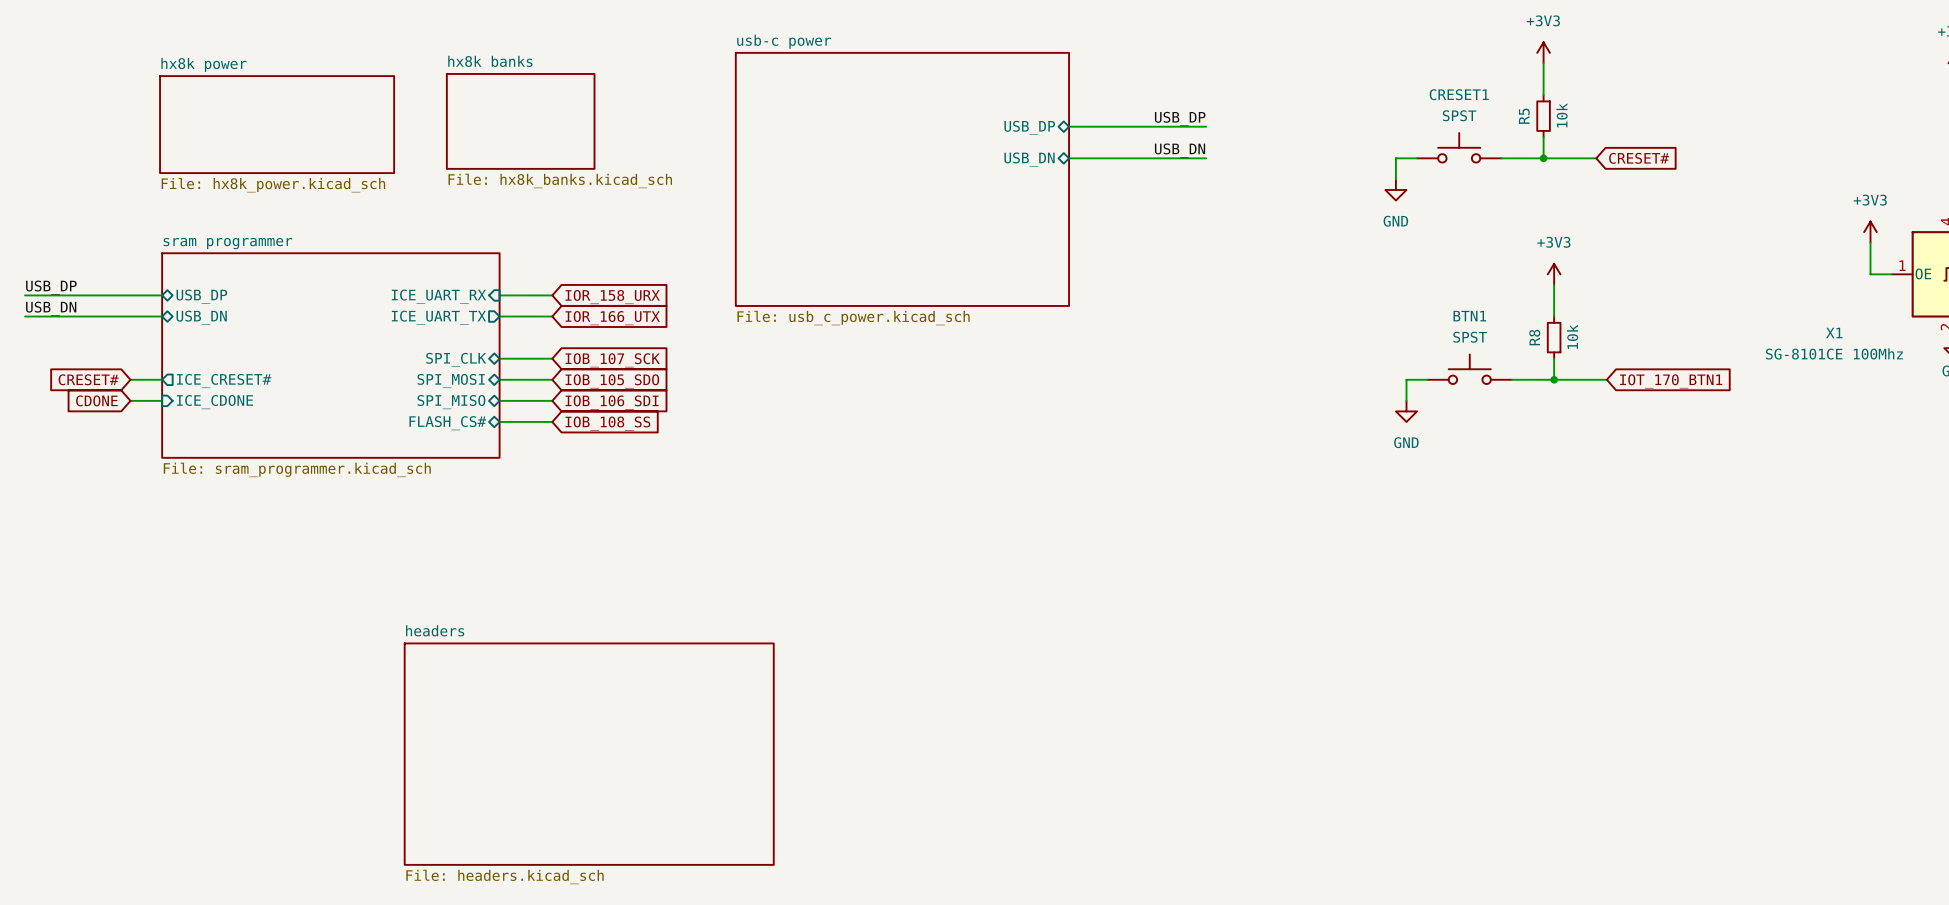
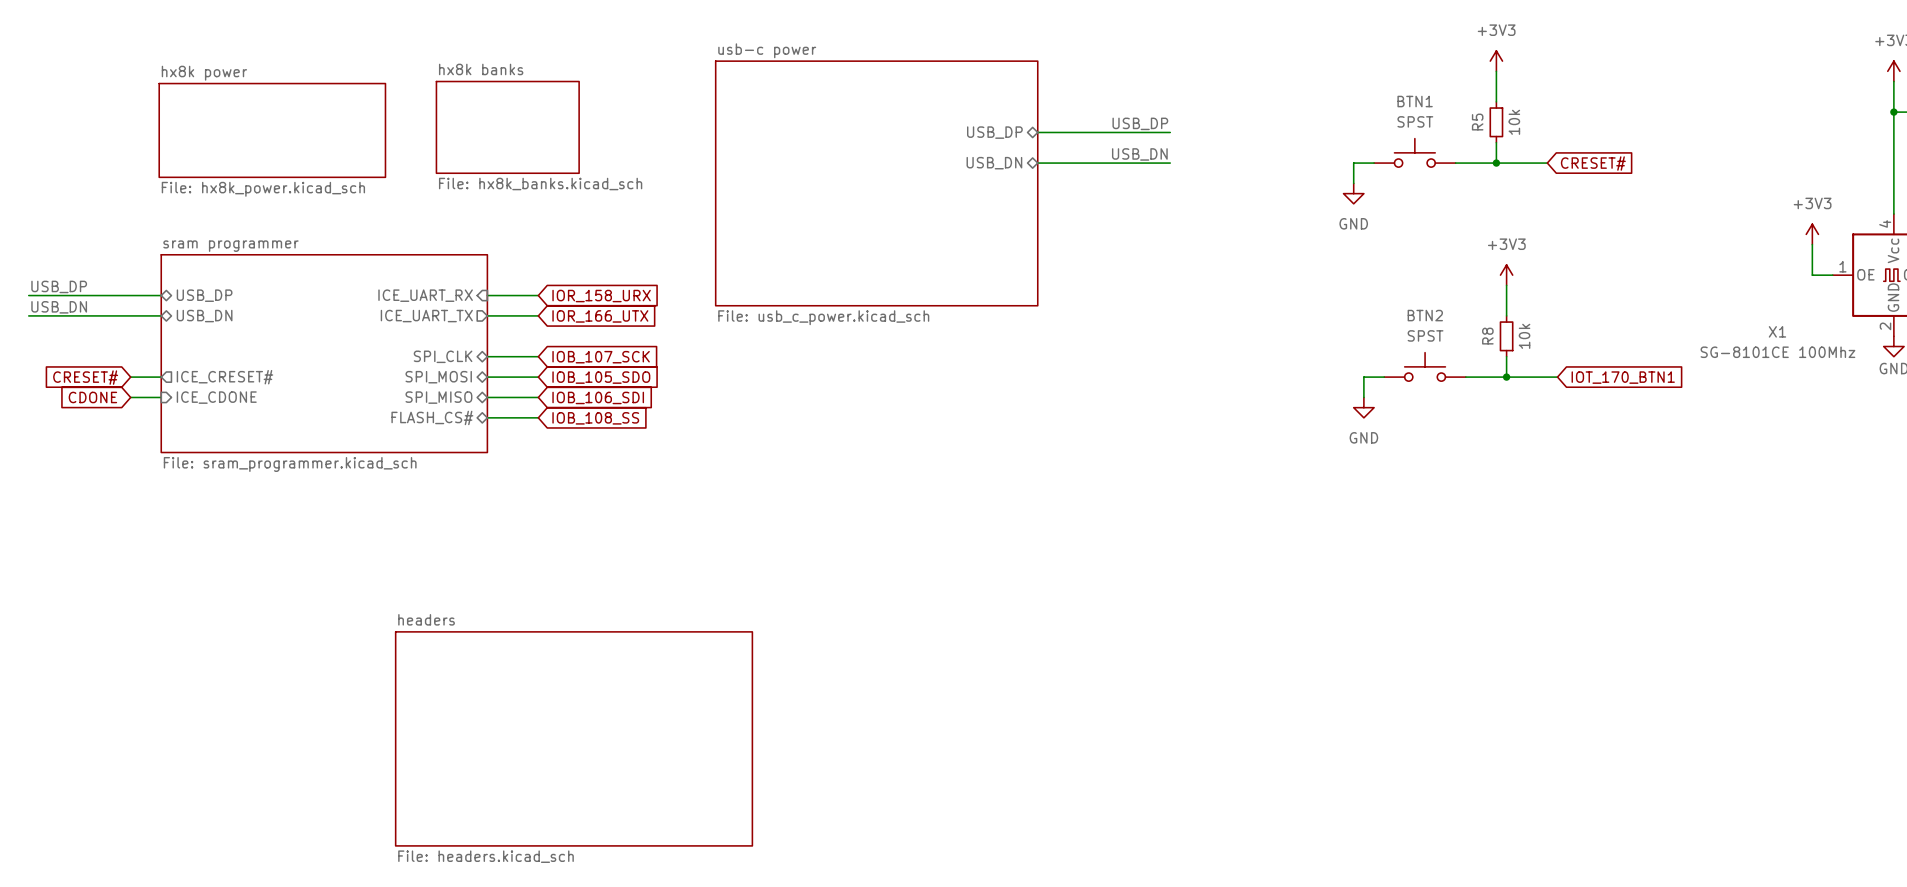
CRESET1 name: CRESET1 (1459, 94) -> BTN1 (1415, 101)
BTN1 name: BTN1 (1469, 316) -> BTN2 (1425, 315)

